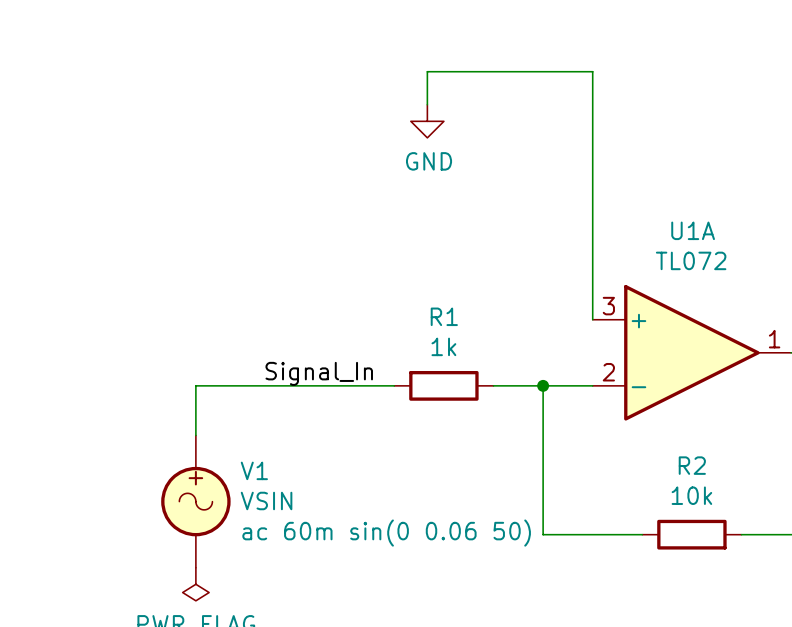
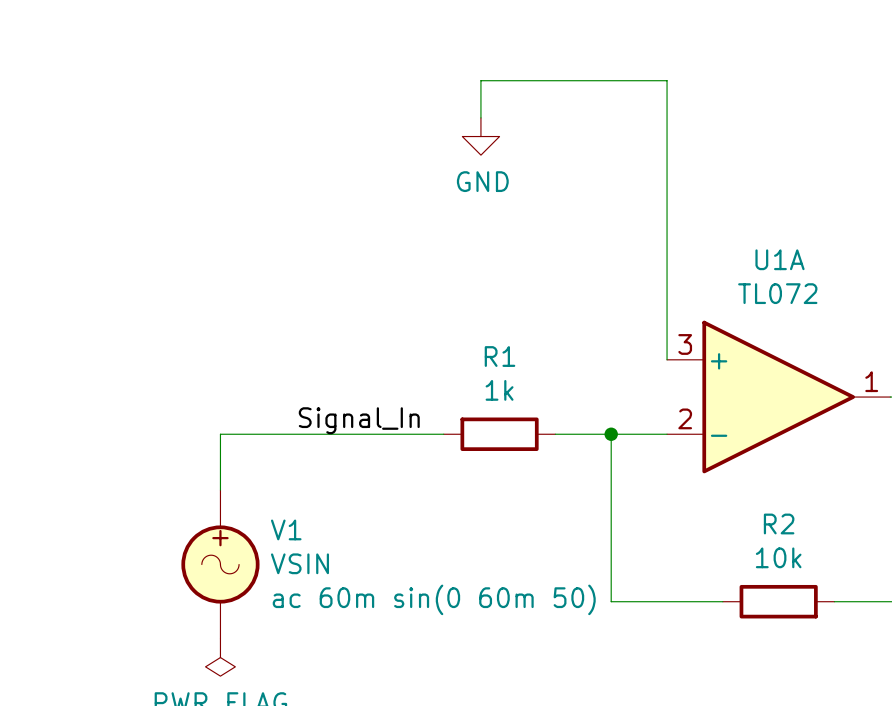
V1 text: ac 60m sin(0 0.06 50) (386, 533) -> ac 60m sin(0 60m 50) (434, 599)

